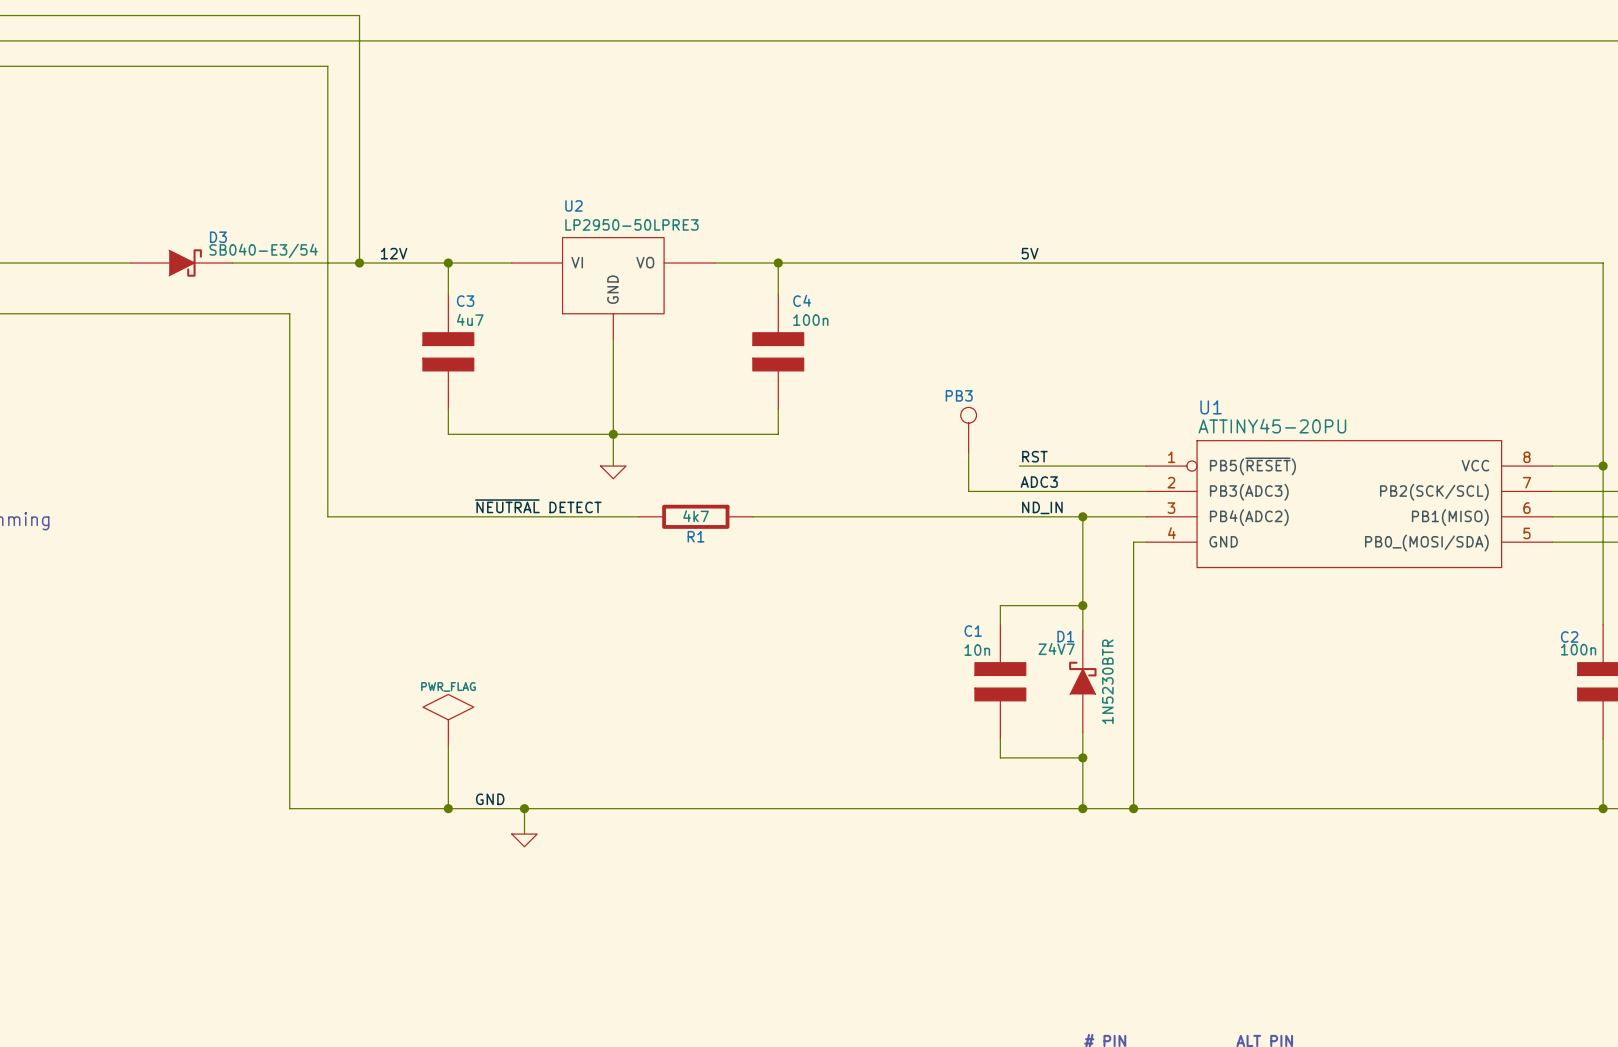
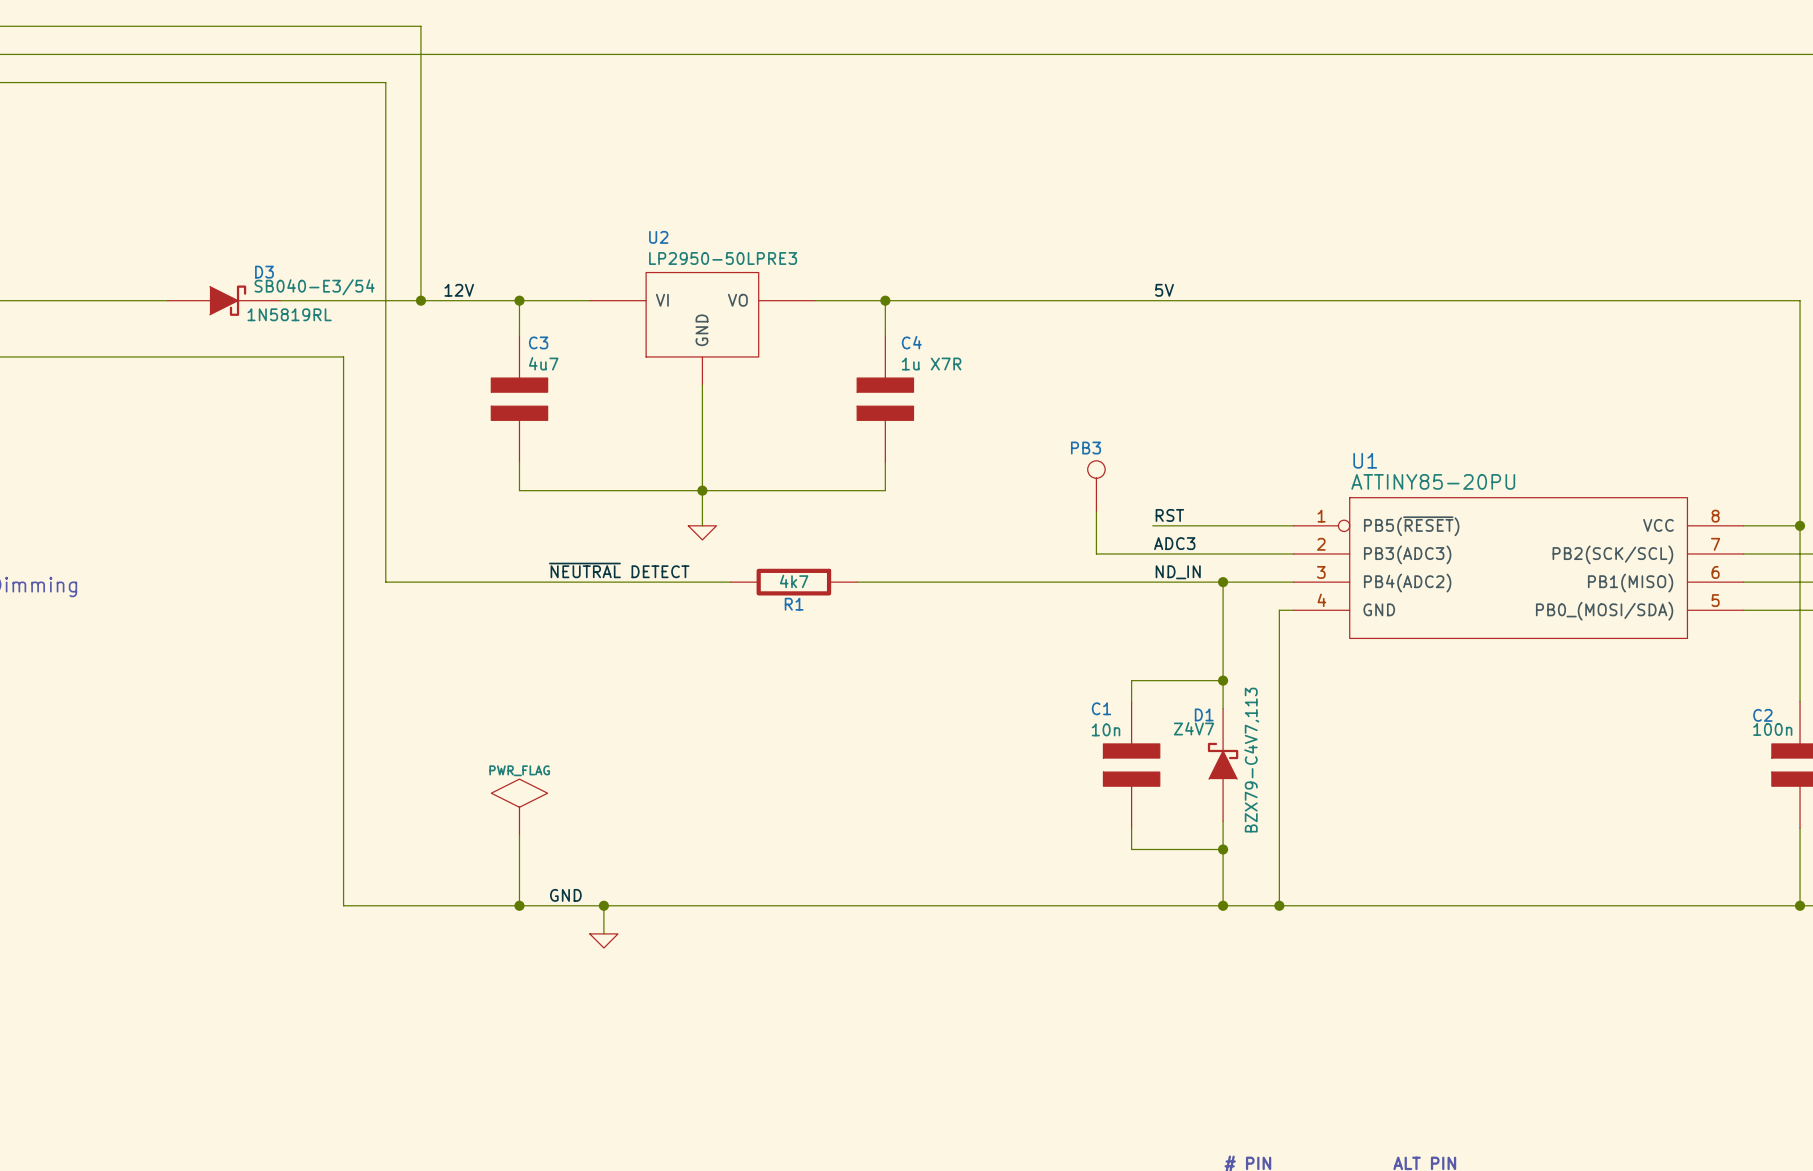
D3 text: none -> 1N5819RL (289, 314)
C4 value: 100n (810, 320) -> 1u X7R (931, 364)
U1 value: ATTINY45-20PU (1272, 426) -> ATTINY85-20PU (1433, 481)
D1 text: none -> BZX79-C4V7,113 (1251, 760)
D1 text: 1N5230BTR (1107, 681) -> none

